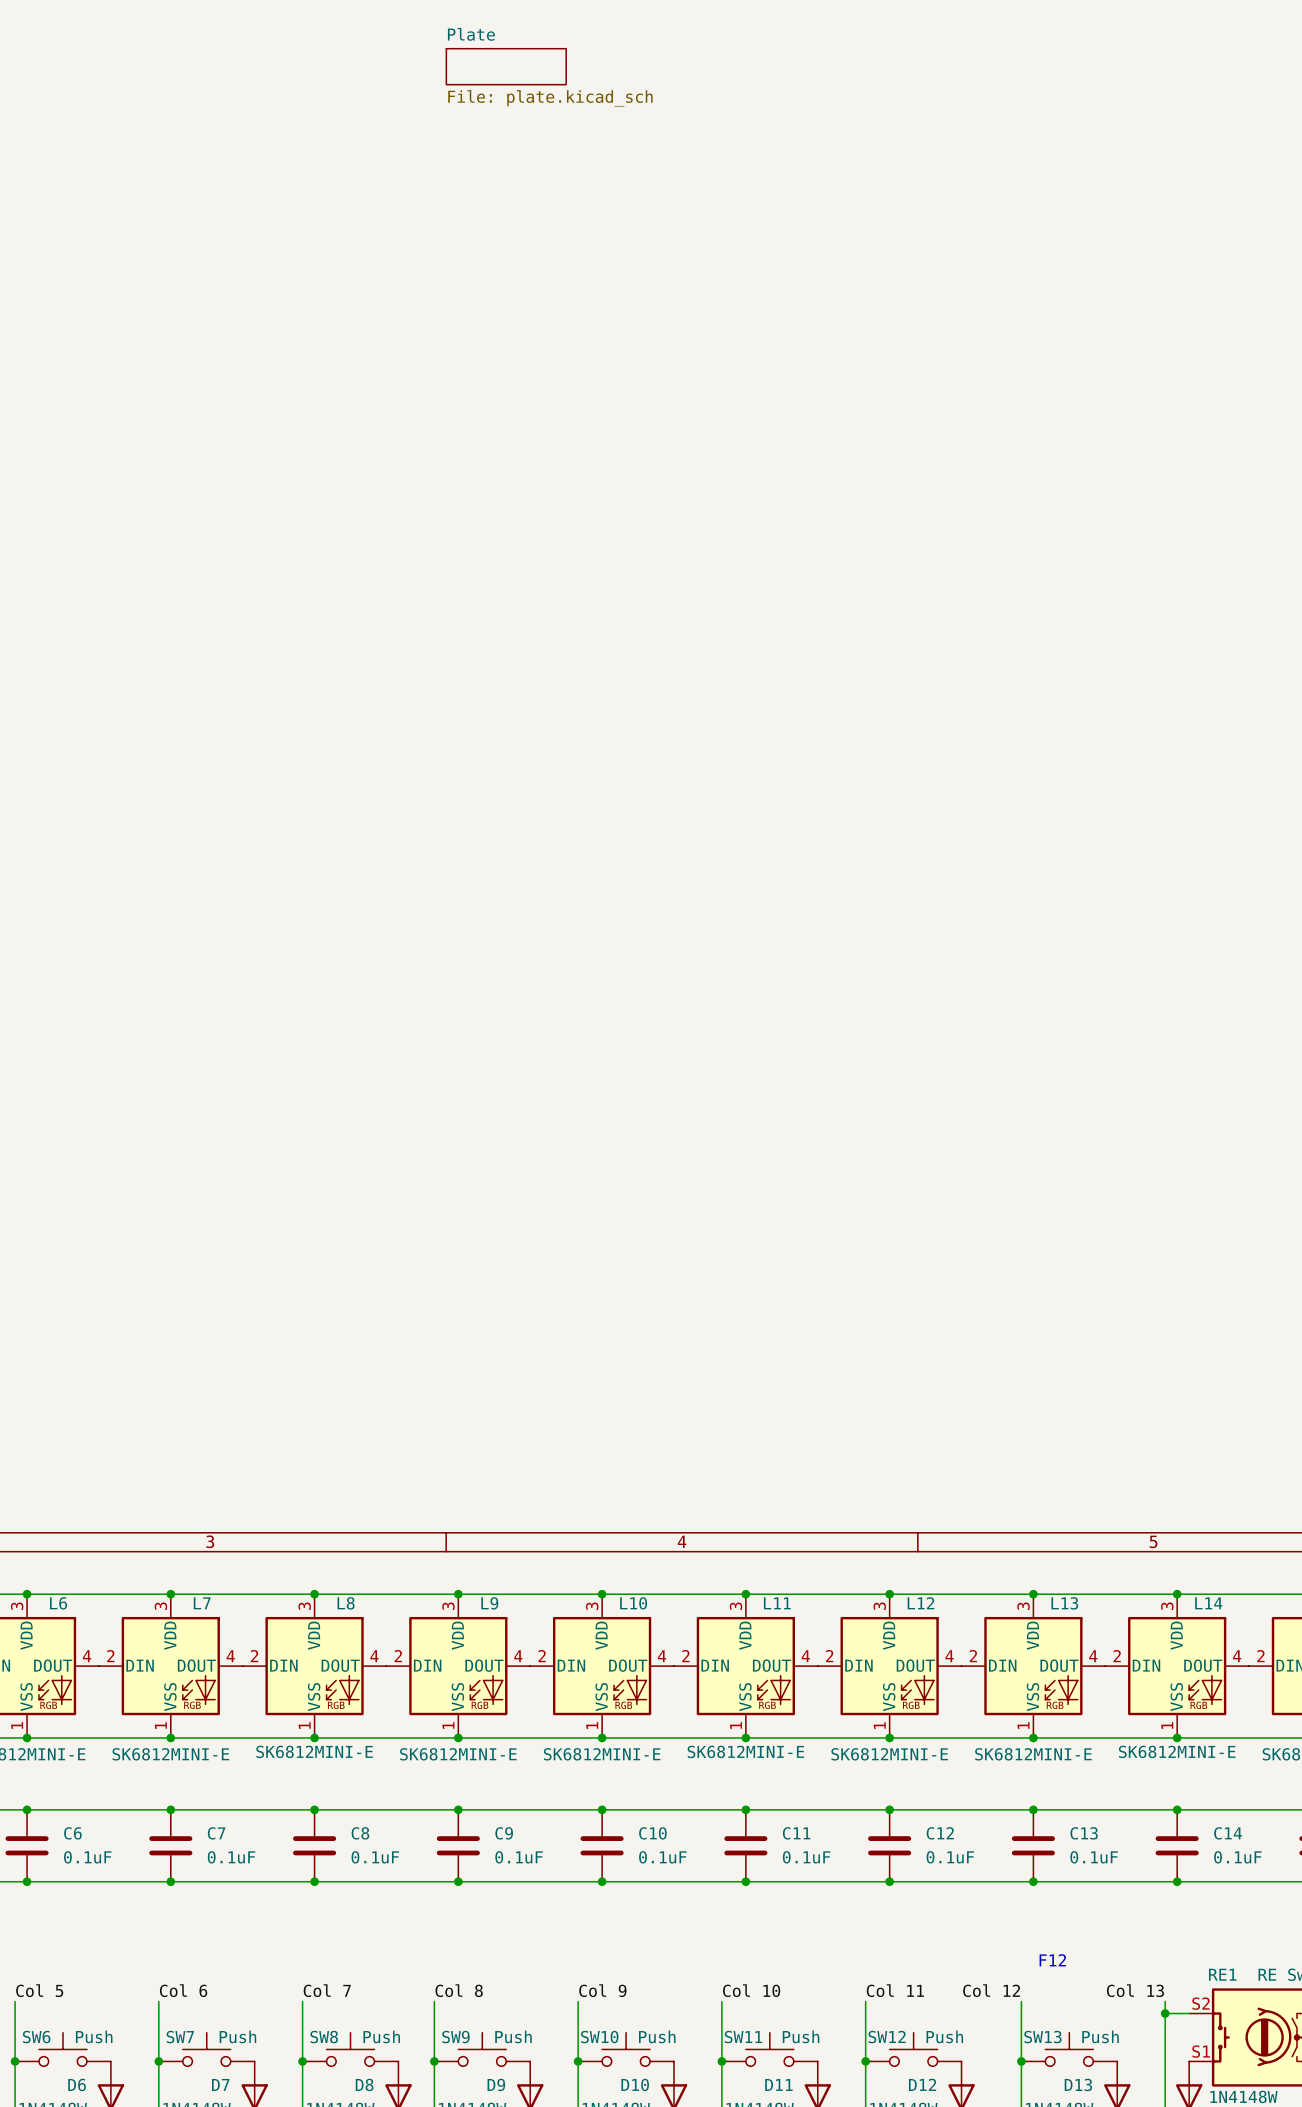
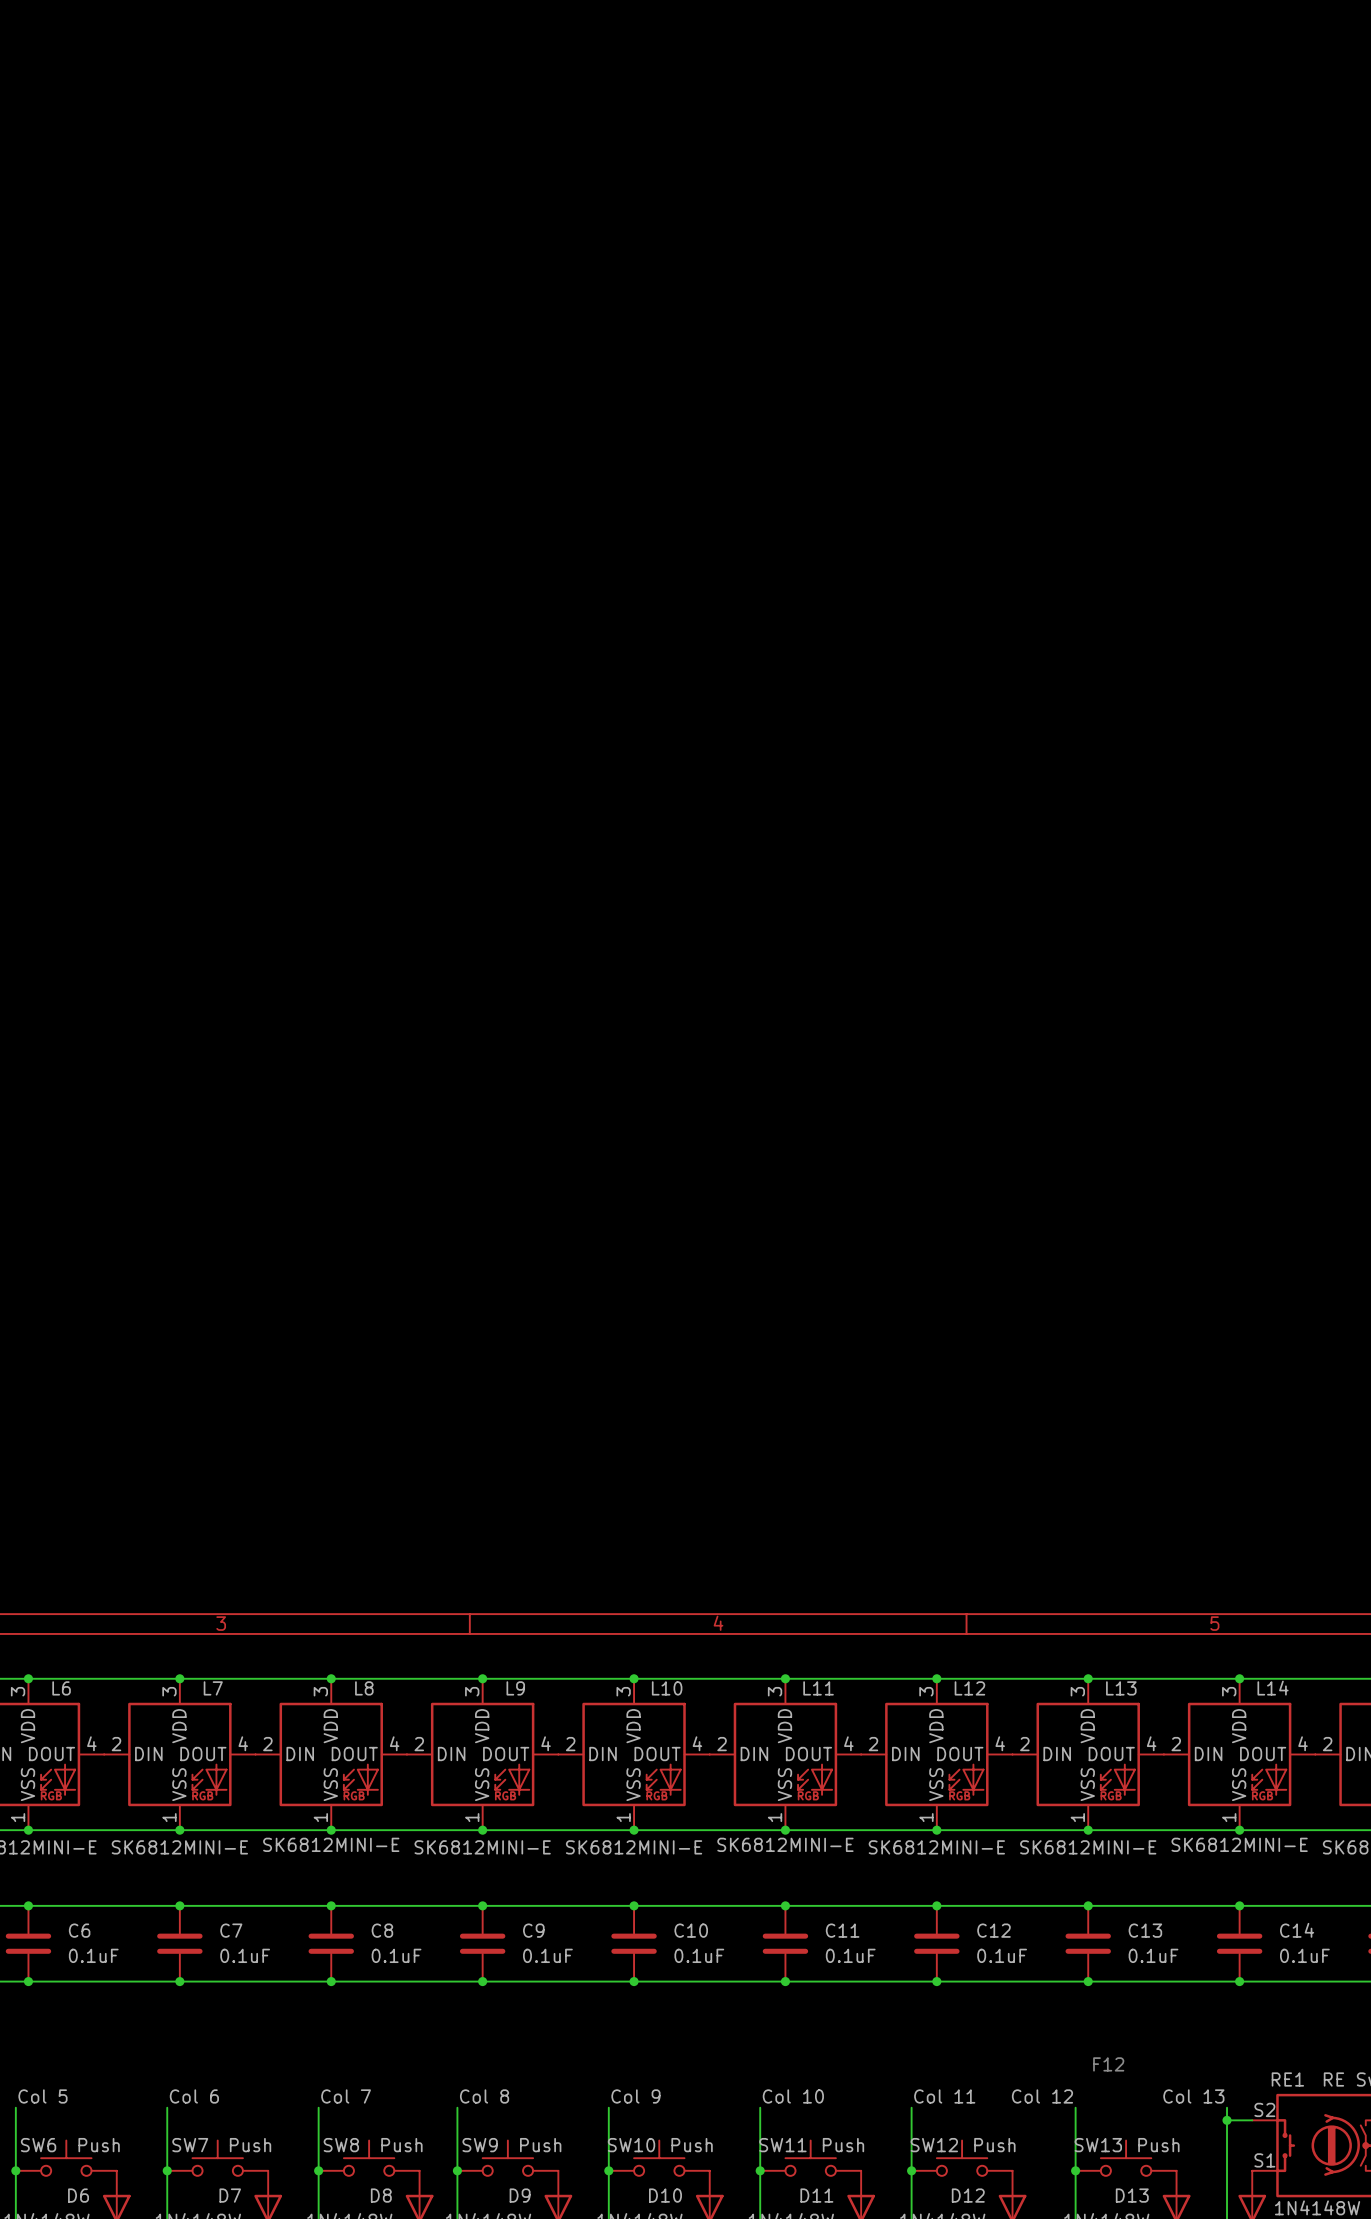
sheet Plate: File: plate.kicad_sch (506, 66) -> none

